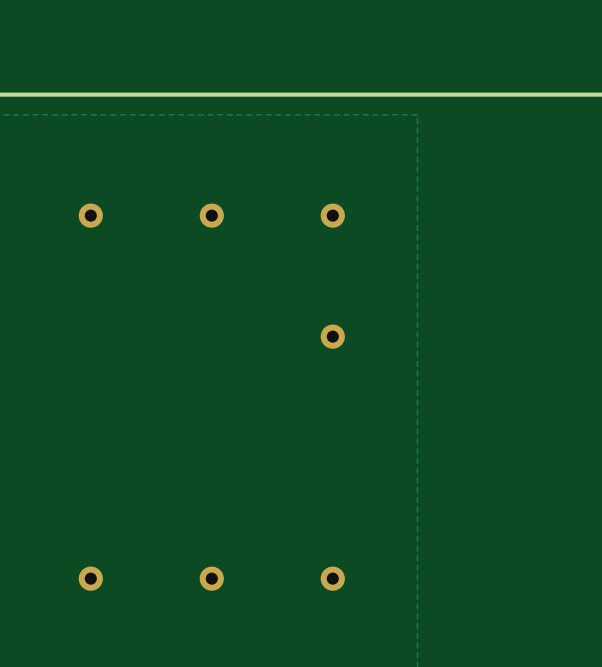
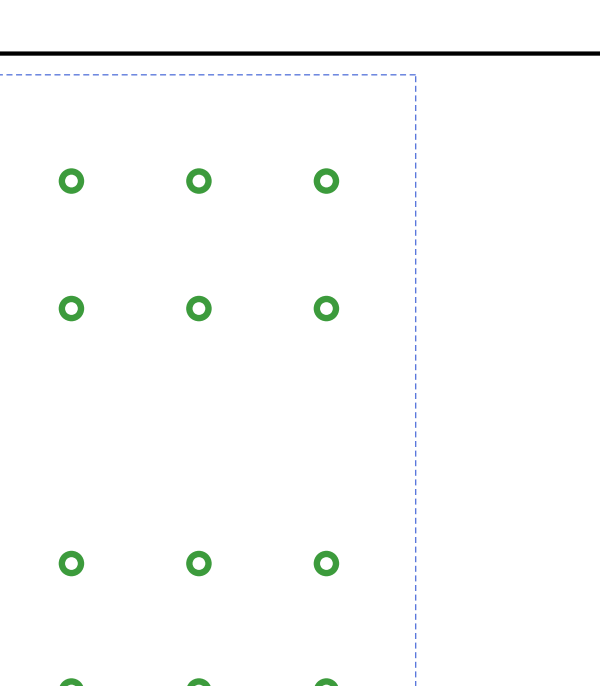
via: none -> (71, 308)
via: none -> (198, 308)

